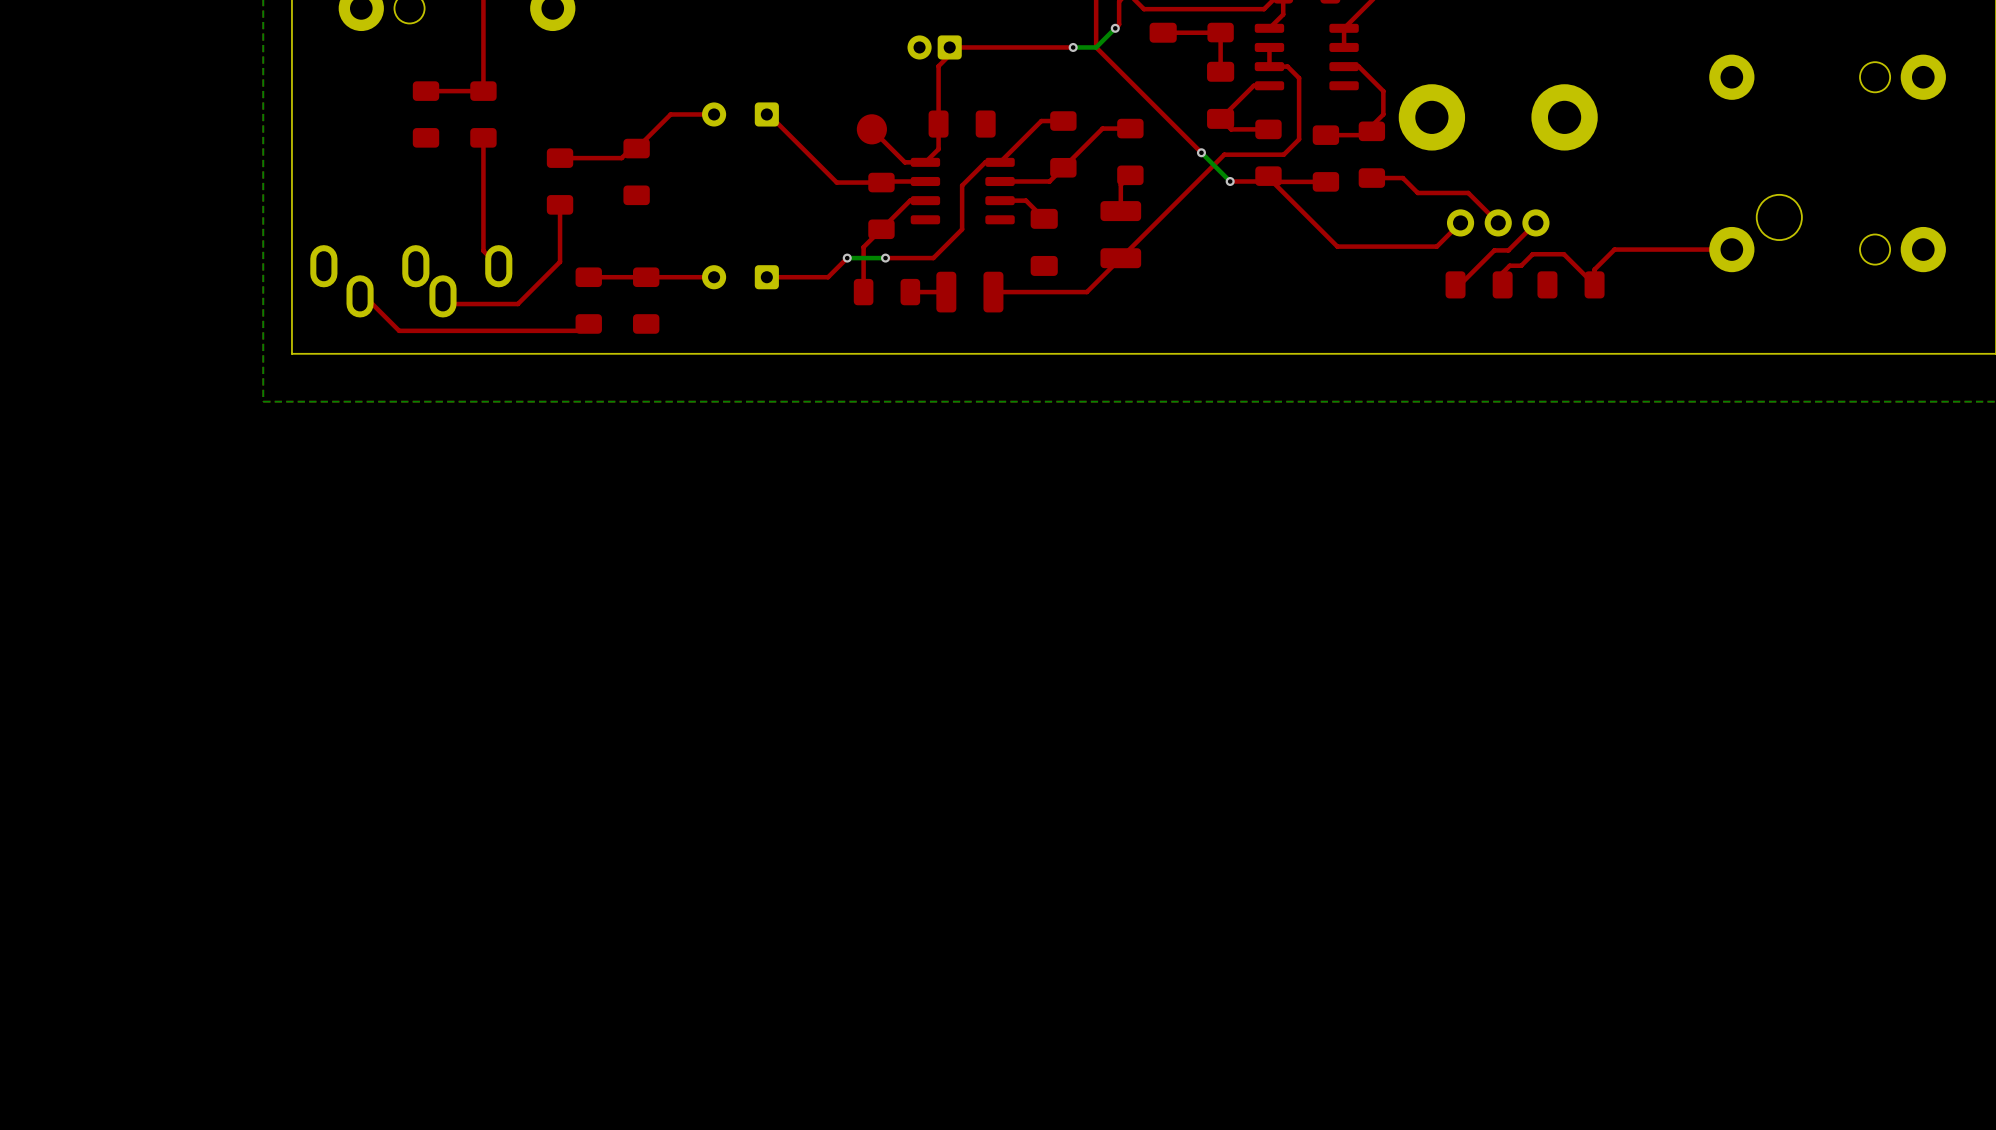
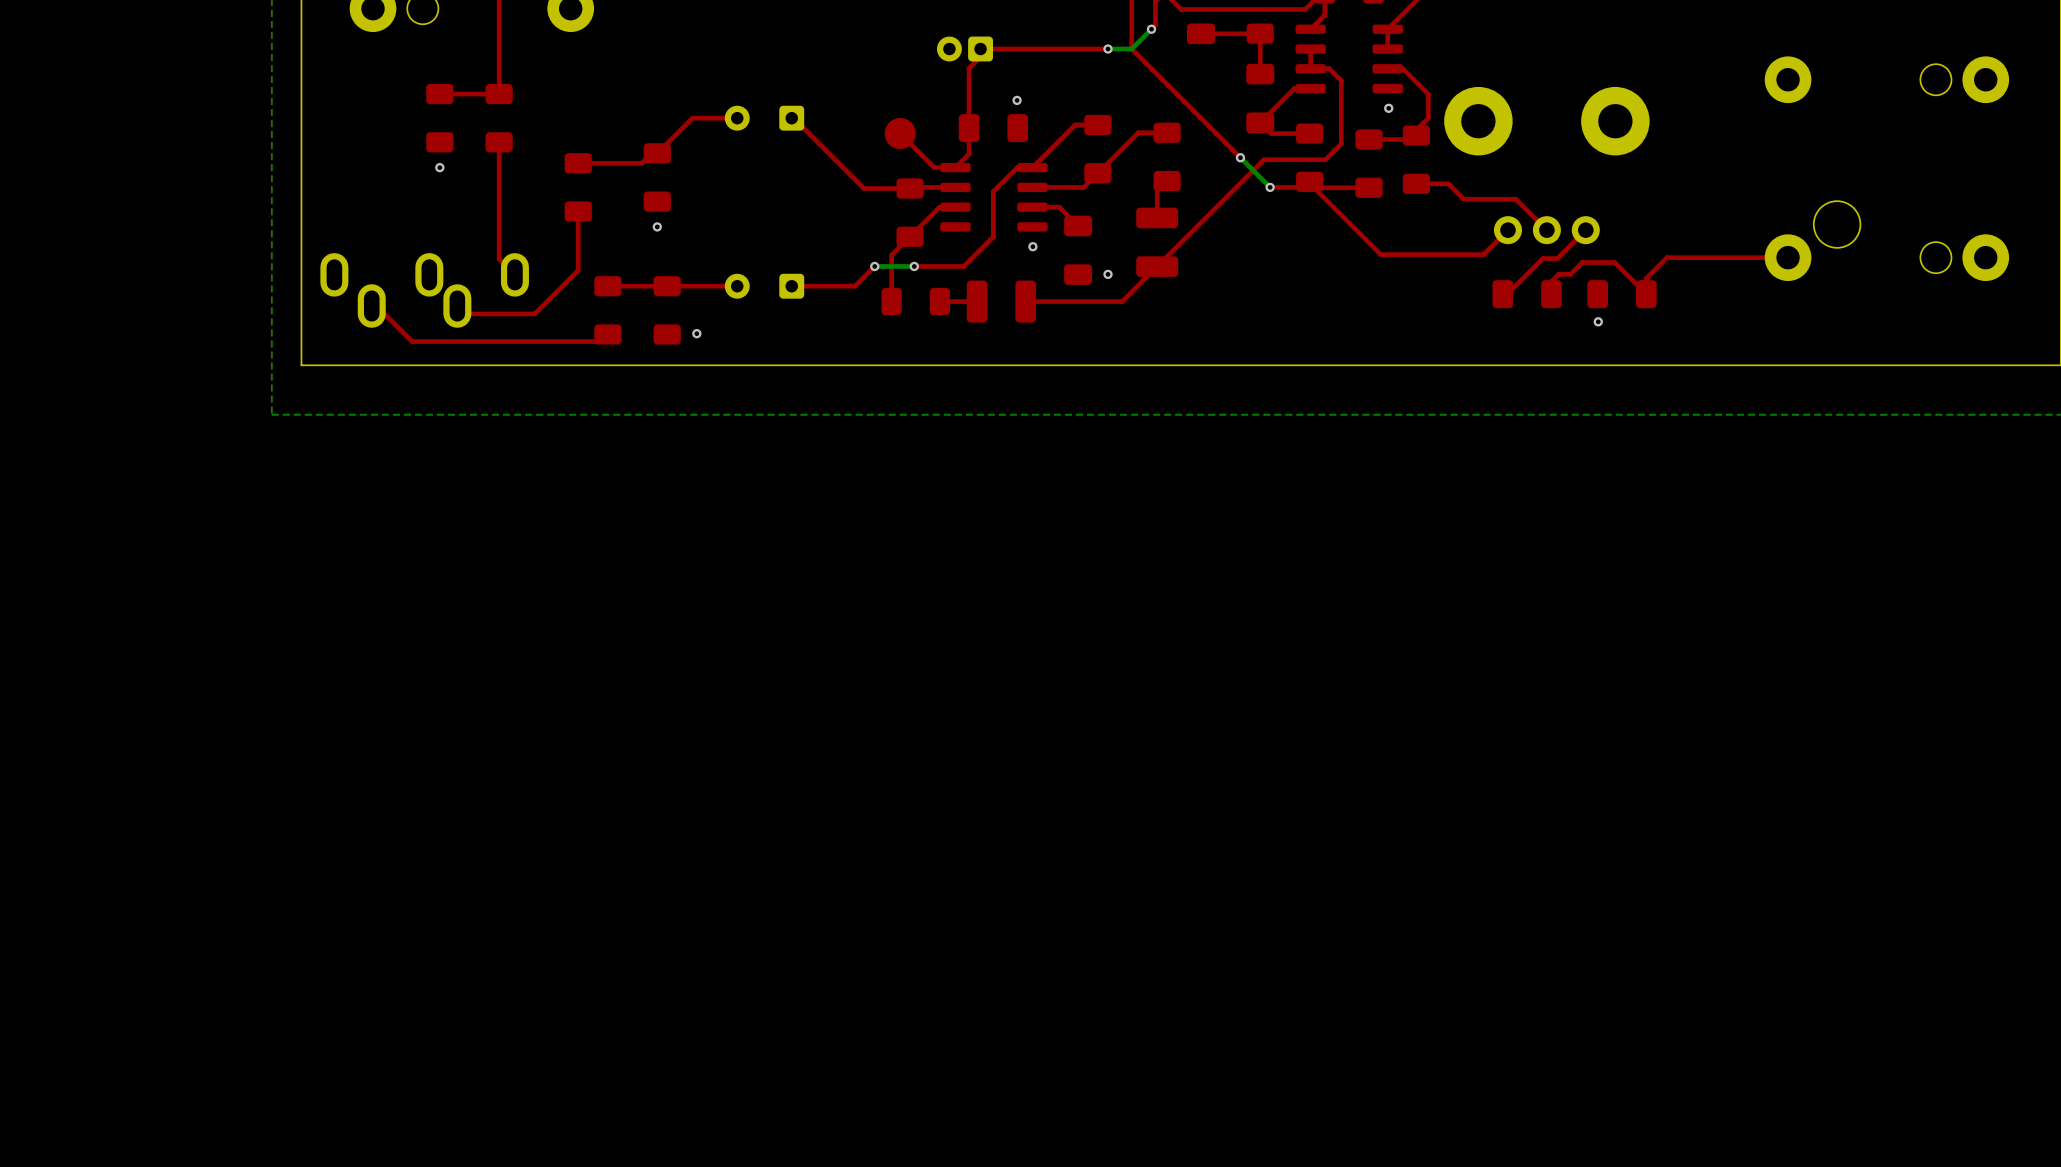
via: none -> (1017, 100)
via: none -> (1388, 108)
via: none -> (439, 167)
via: none -> (657, 226)
via: none -> (1032, 246)
via: none -> (1108, 274)
via: none -> (1598, 321)
via: none -> (696, 333)

